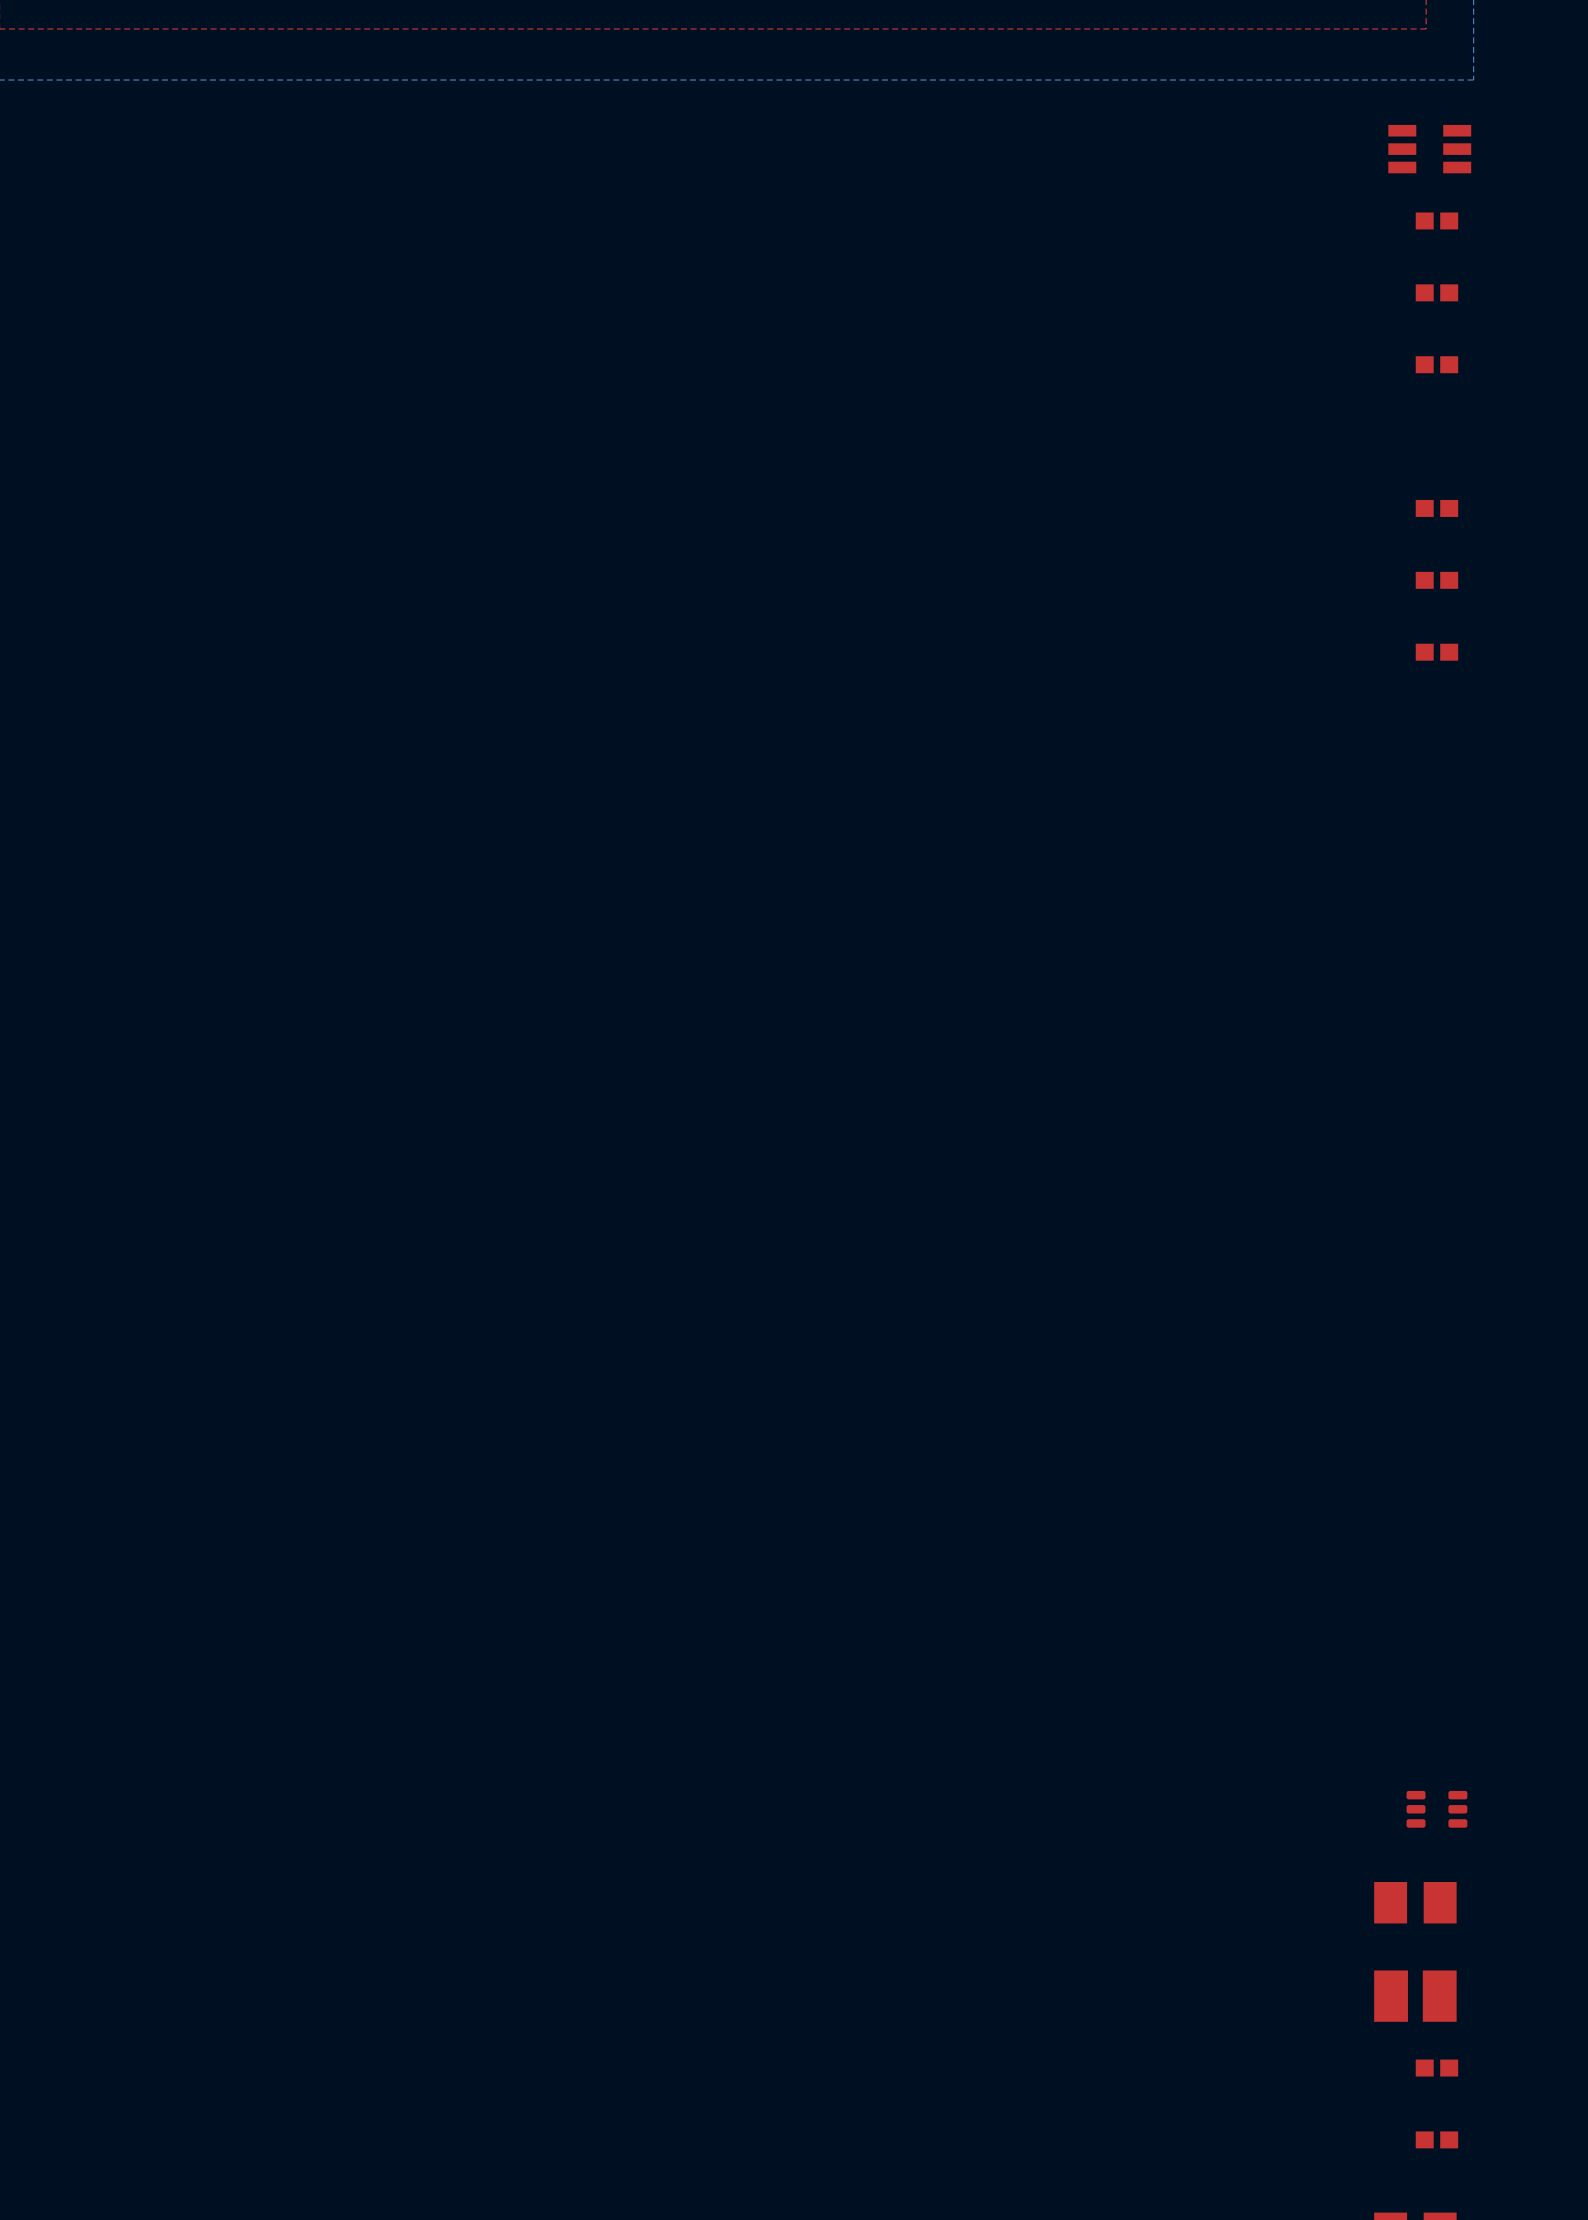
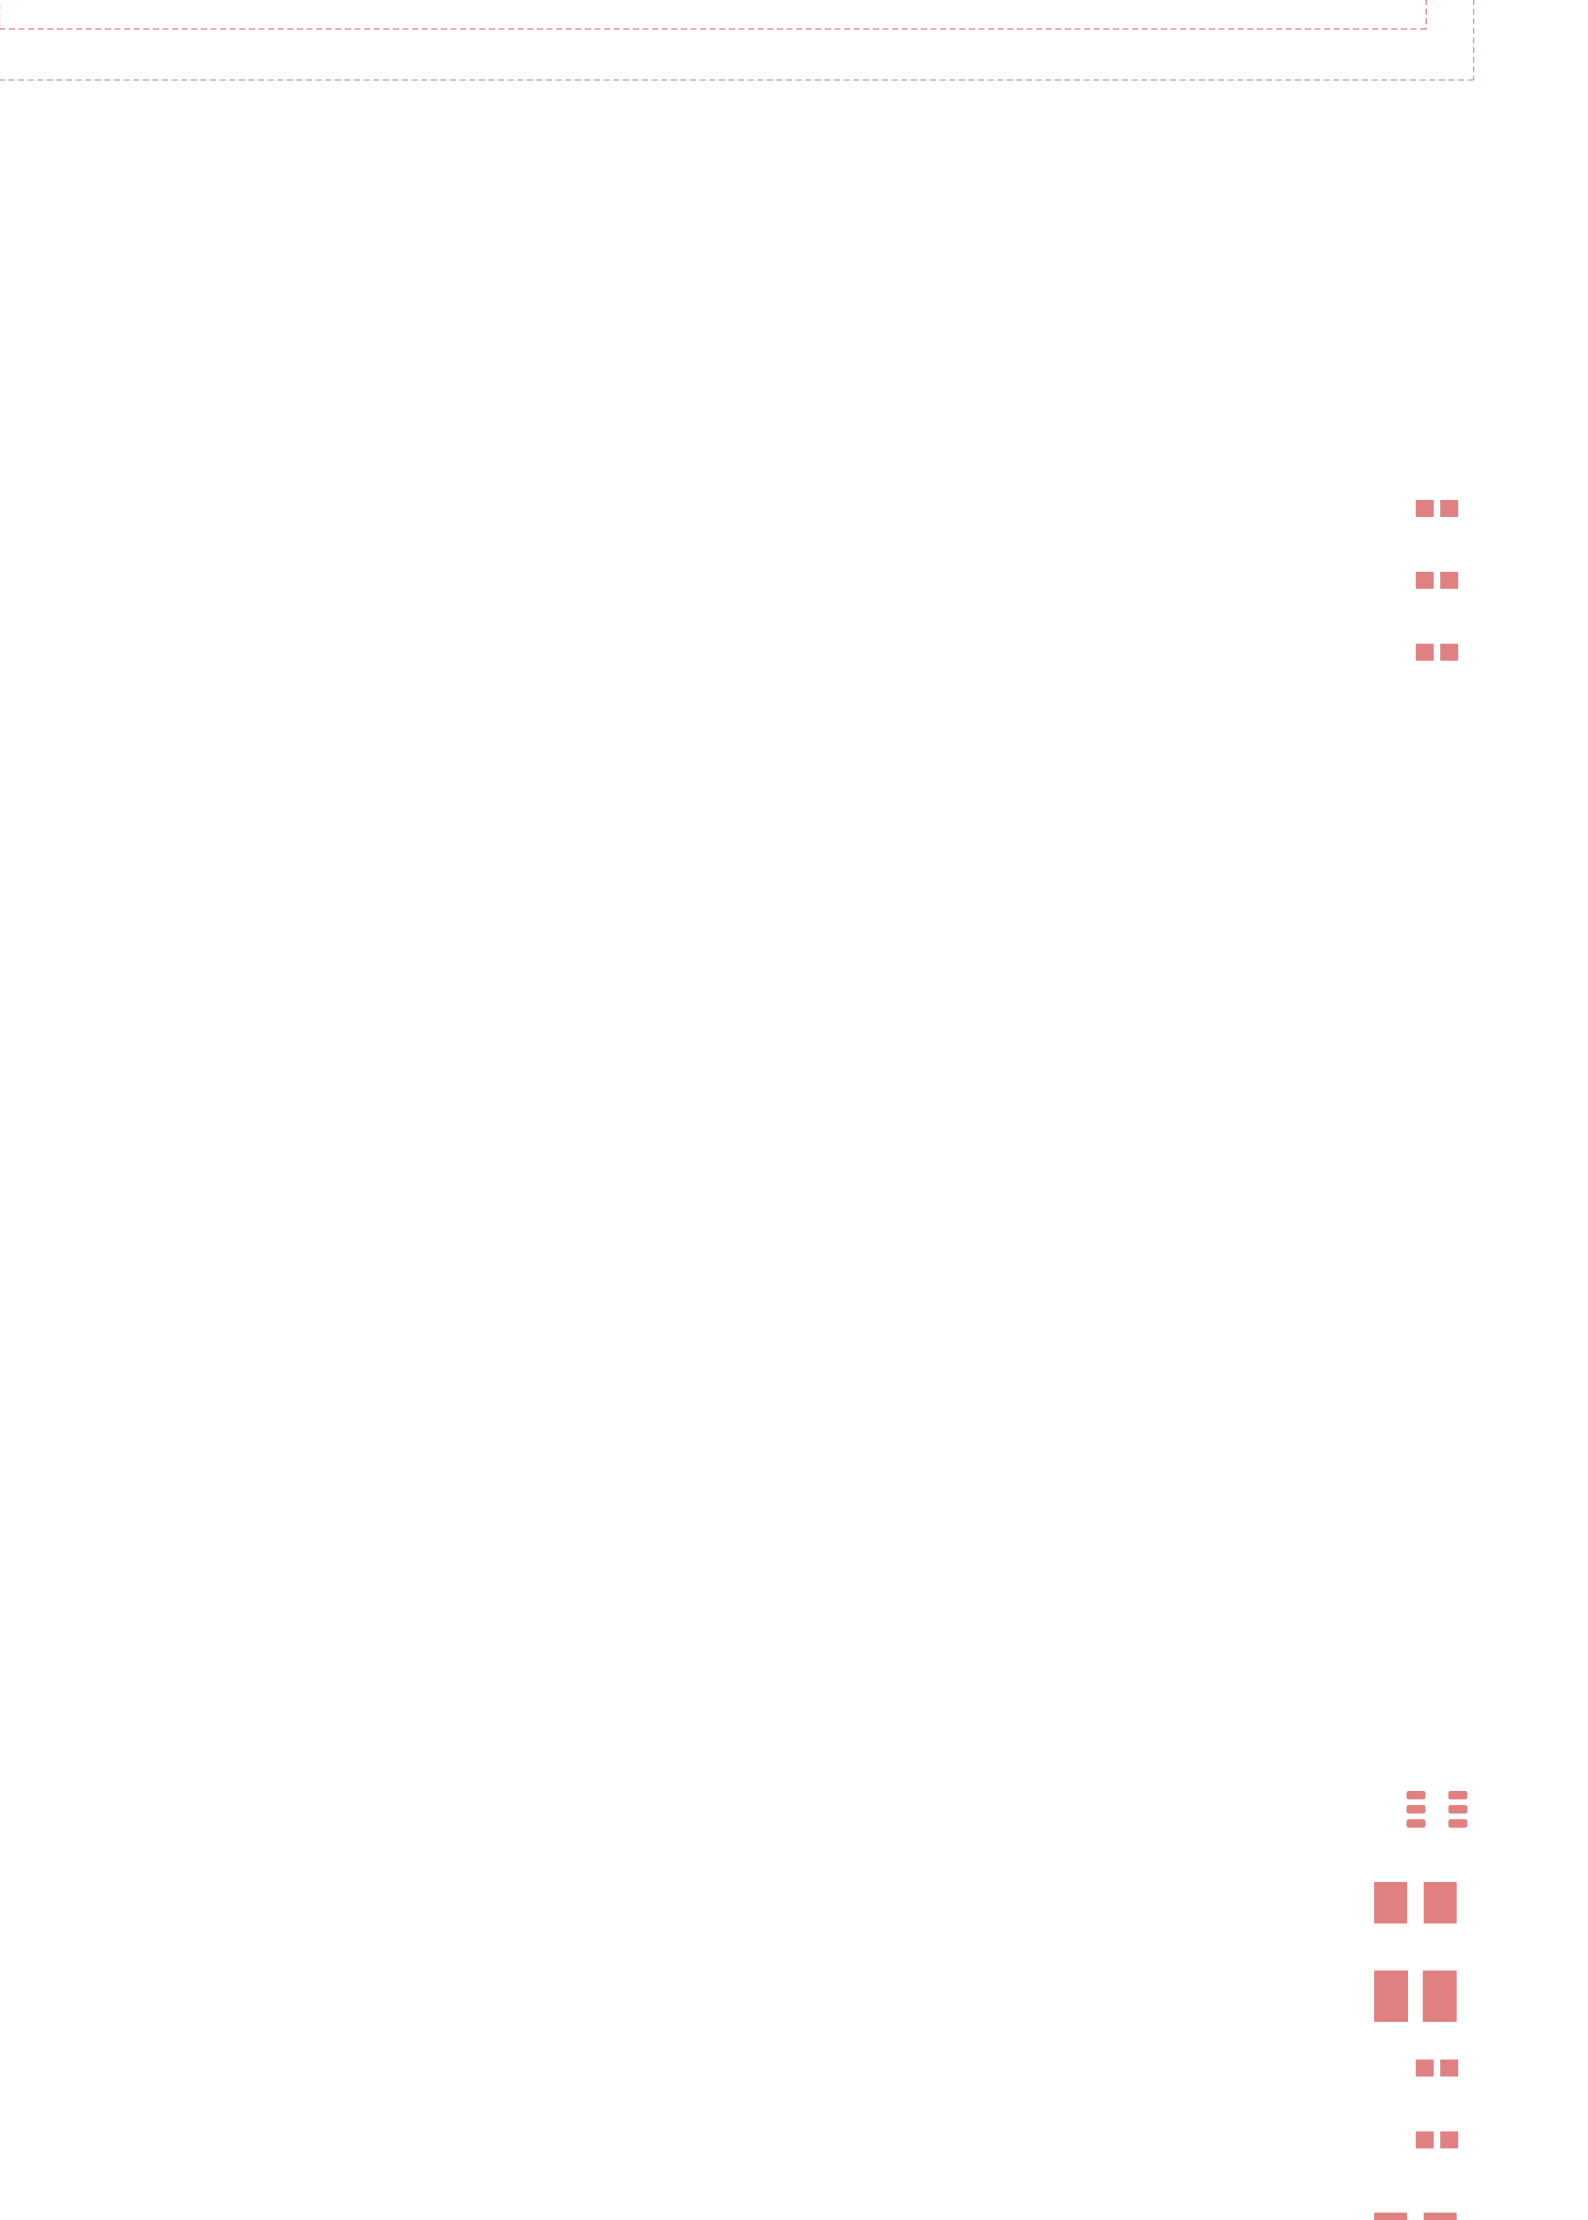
part: (1429, 149) -> none
part: (1436, 220) -> none
part: (1436, 292) -> none
part: (1436, 364) -> none

